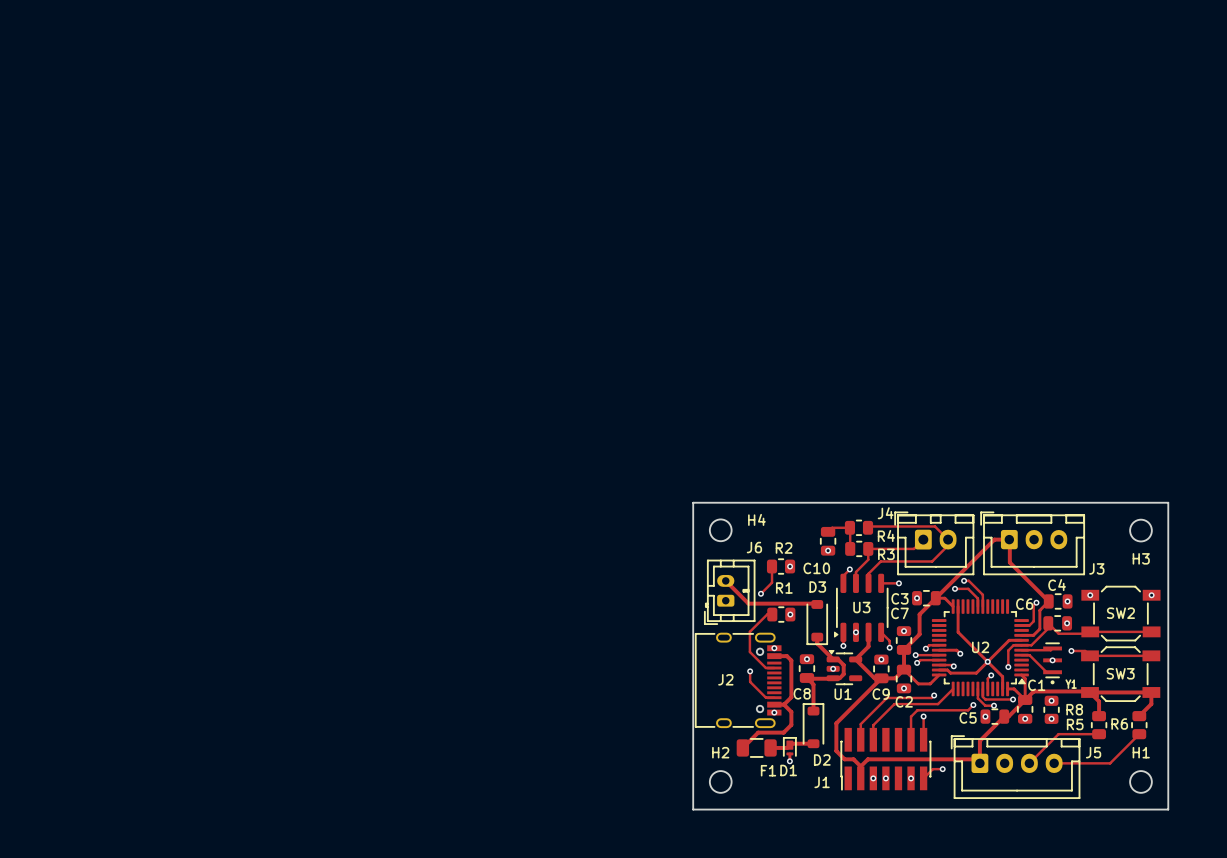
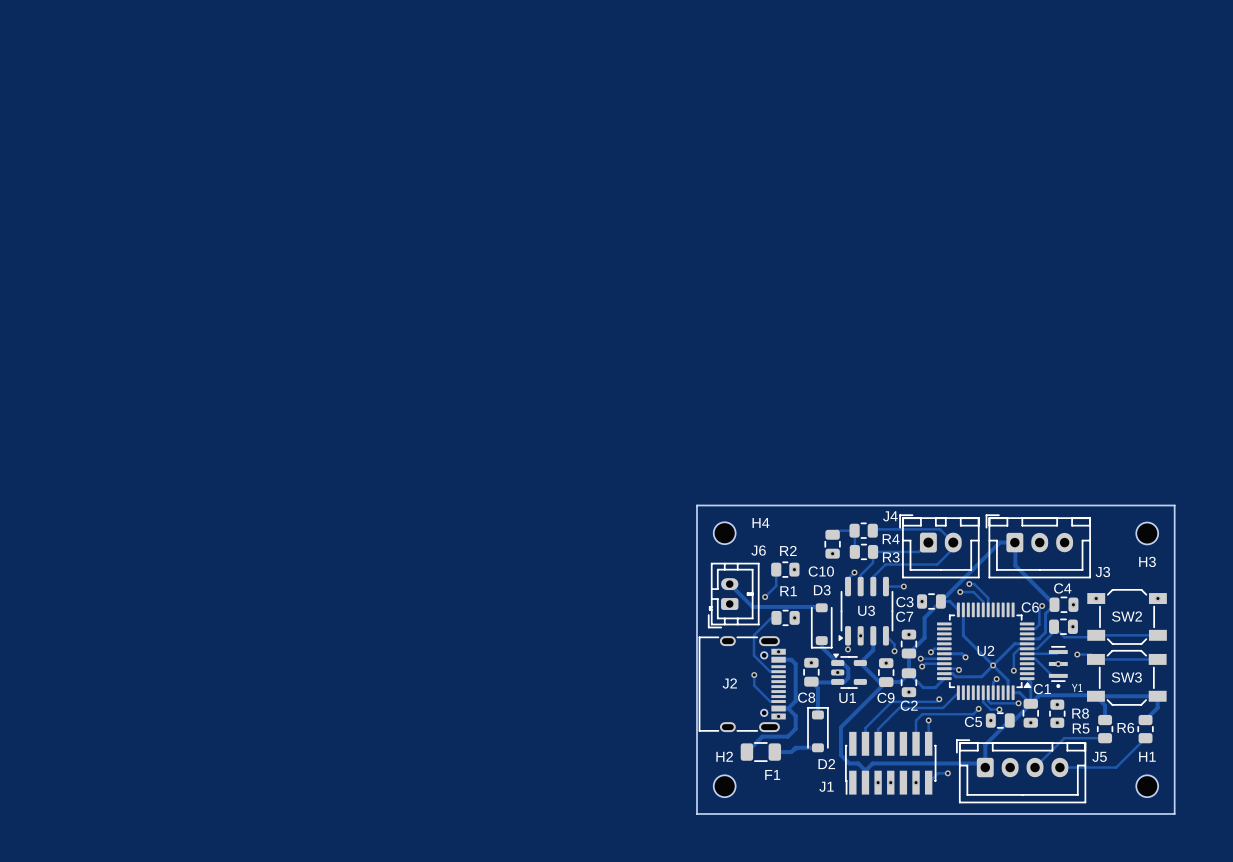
D1: (789, 746) -> none
track: (789, 753) (789, 761) -> none
via: (789, 761) -> none

